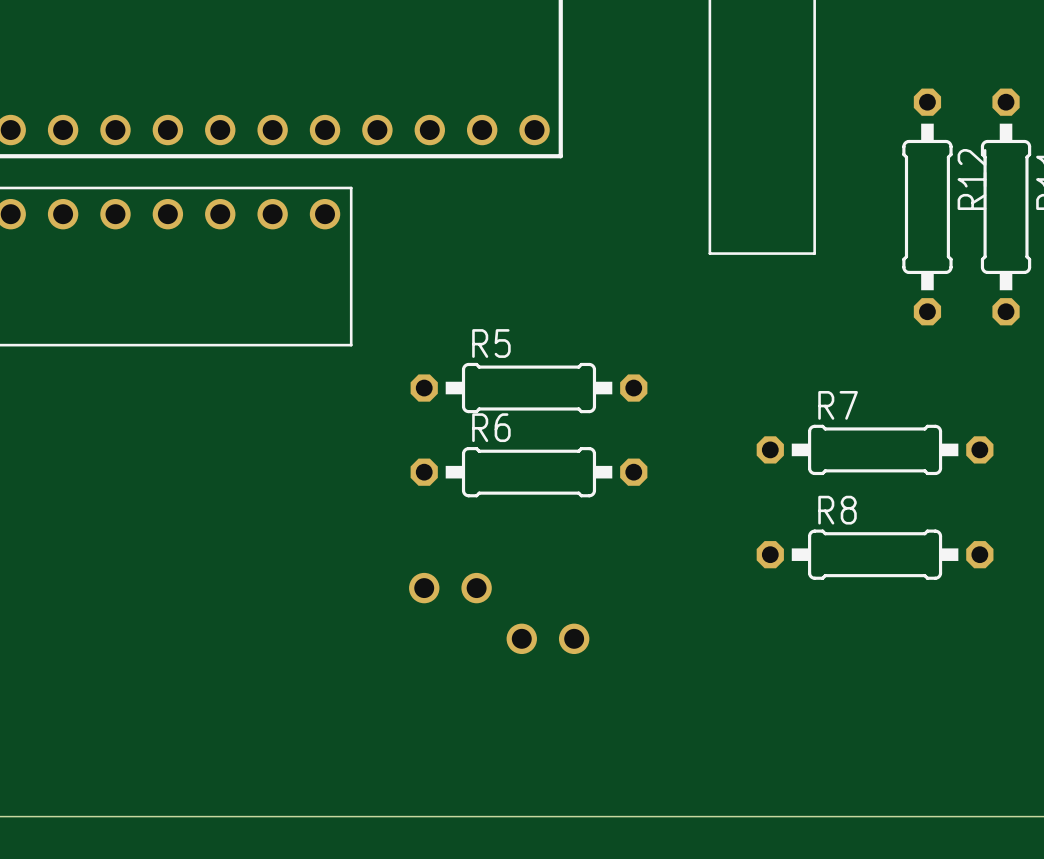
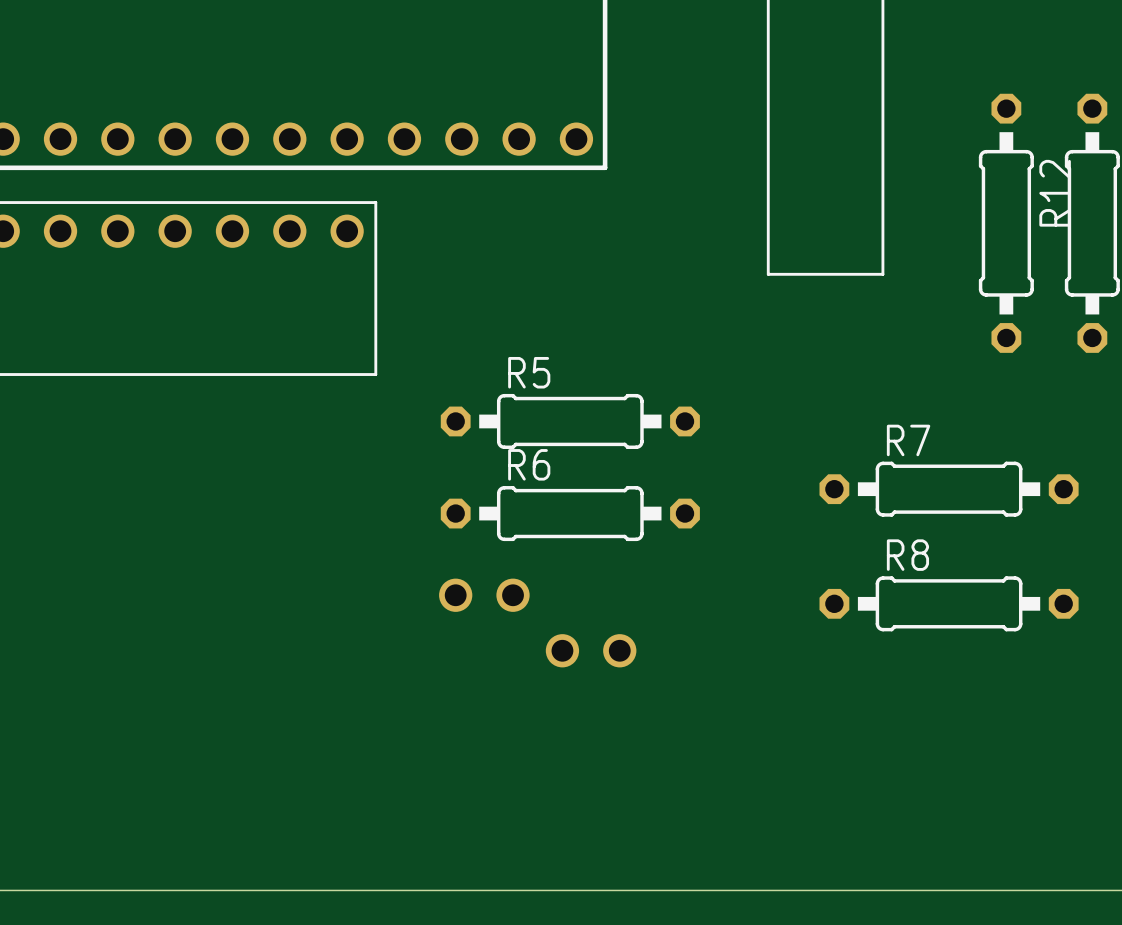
part position: (450, 588) -> (484, 595)
part position: (547, 638) -> (591, 650)

